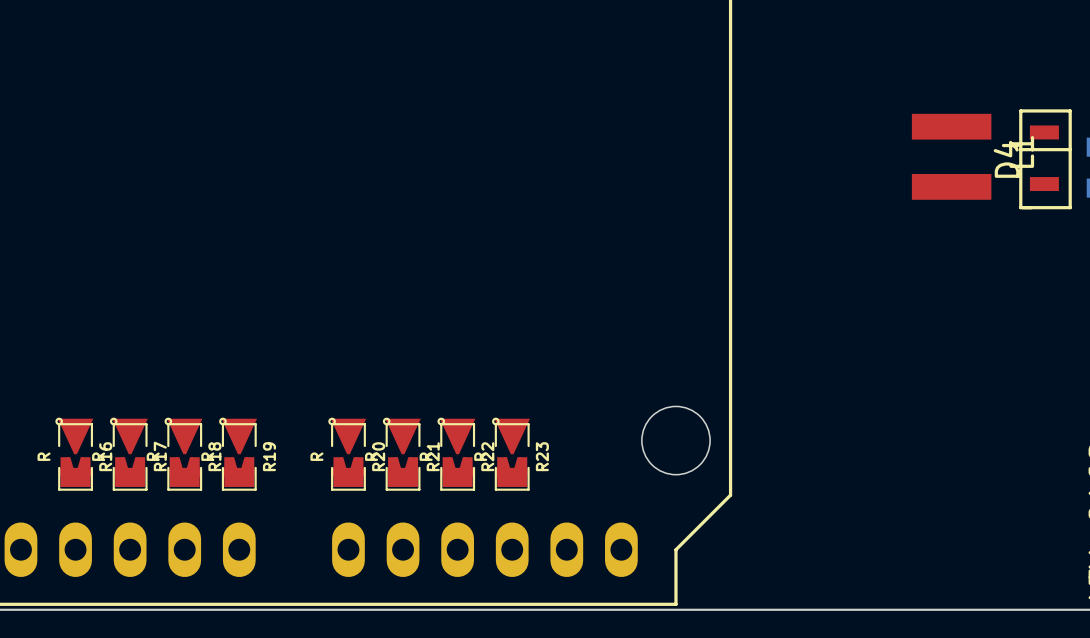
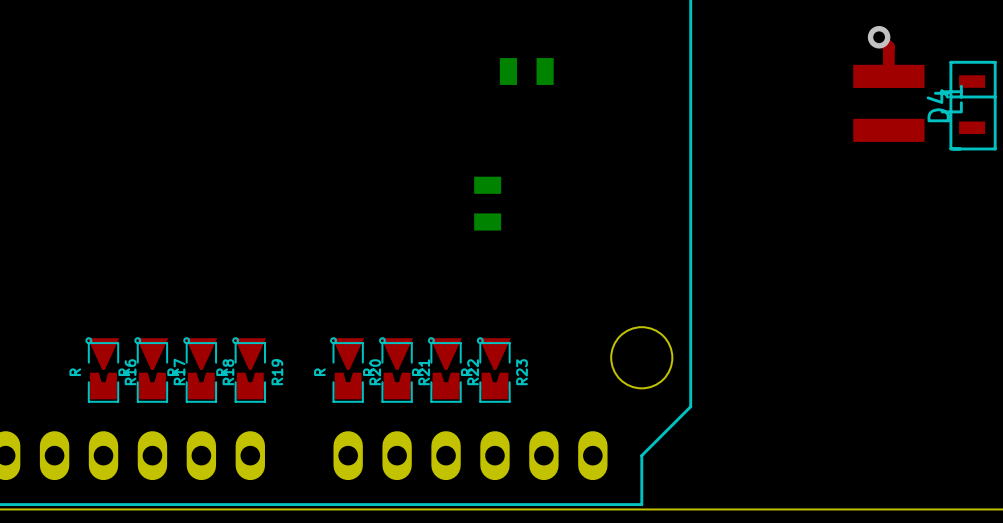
top track: none -> (879, 37) (888, 47) (888, 76)
via: none -> (879, 37)
part: none -> (526, 71)
part: none -> (487, 203)

